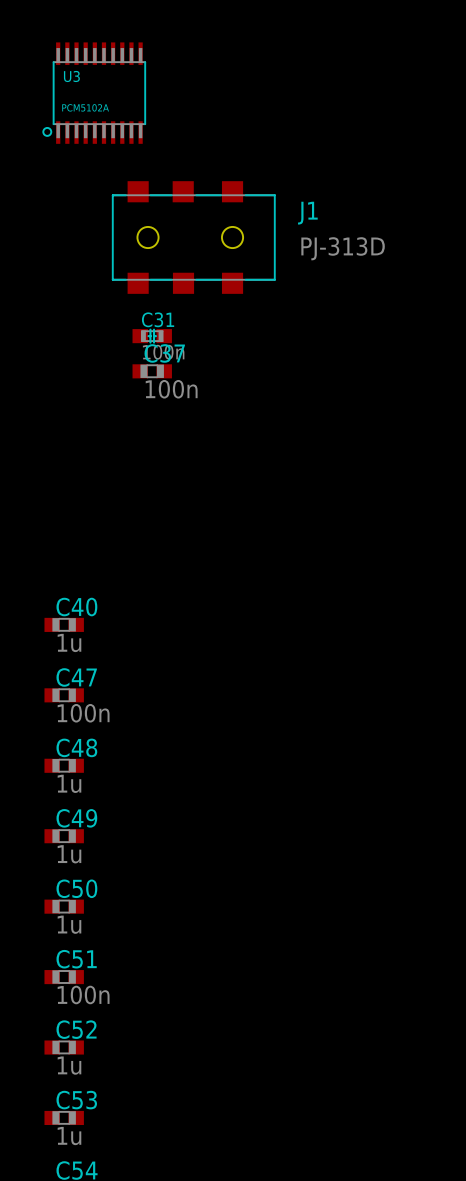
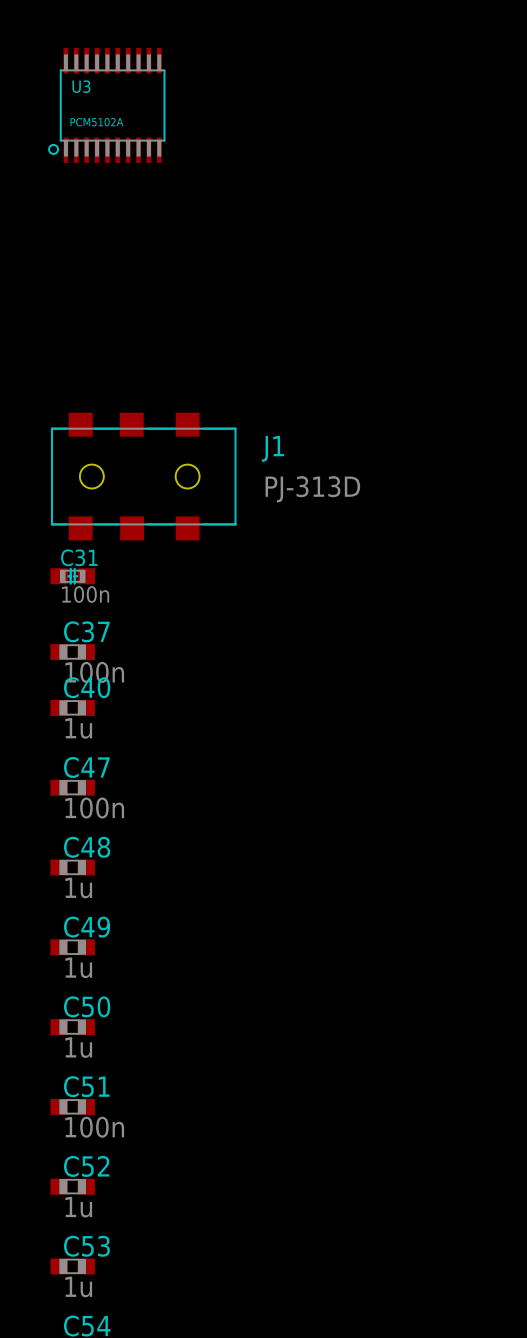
J1 position: (193, 237) -> (143, 476)
C31 position: (152, 336) -> (72, 576)
C37 position: (152, 371) -> (72, 652)

